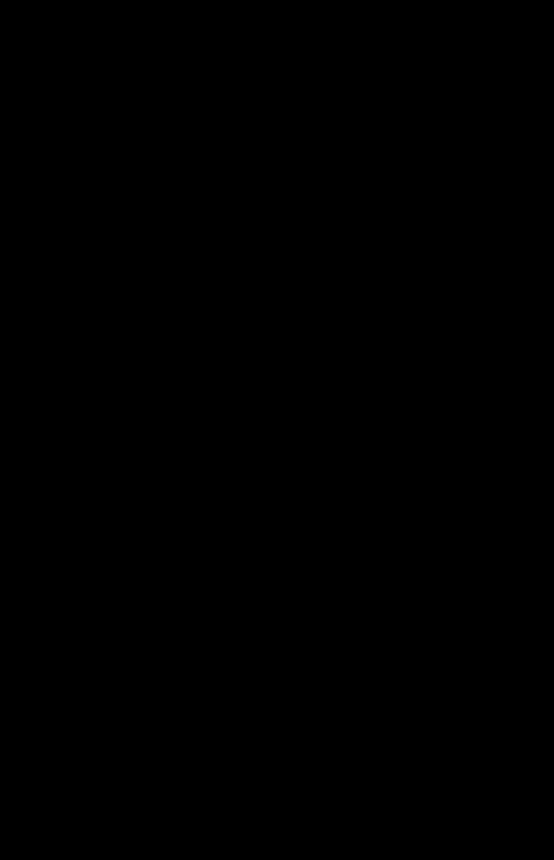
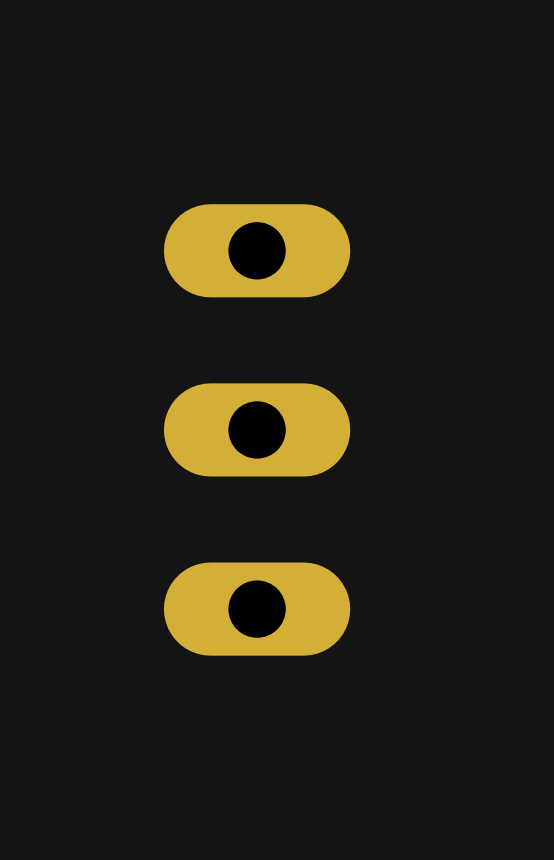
part: none -> (257, 429)

